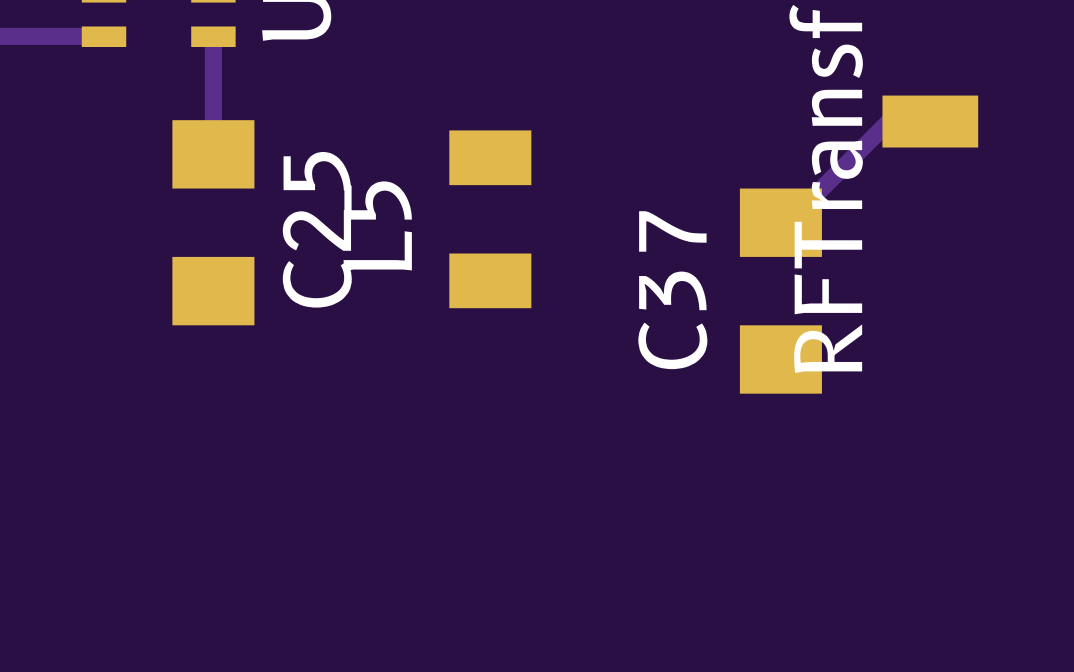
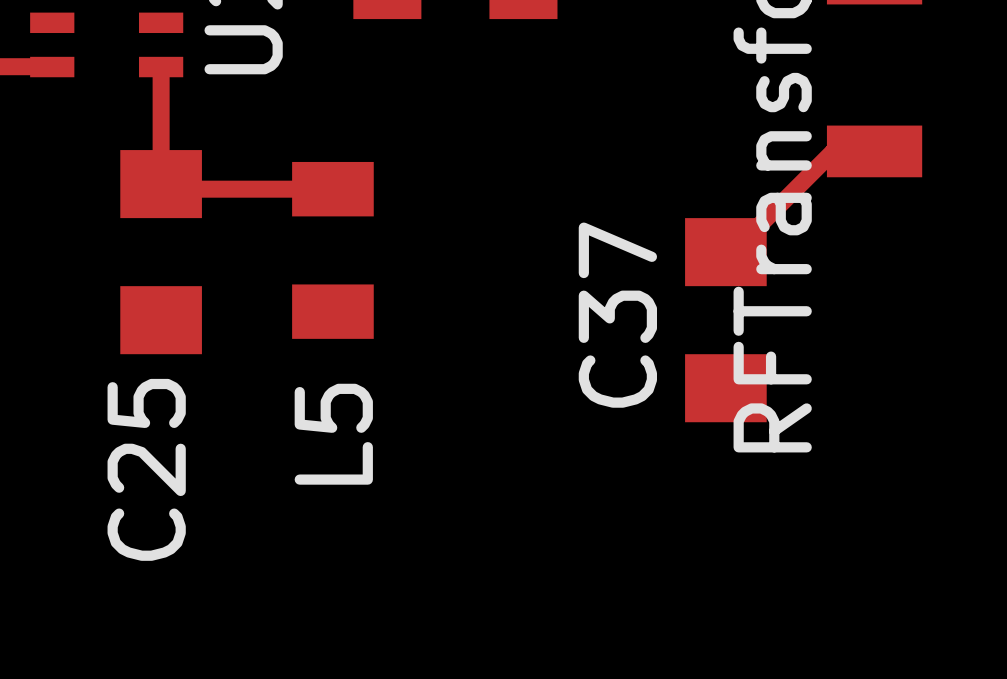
track: none -> (161, 184) (166, 189) (332, 189)
L5 position: (490, 219) -> (332, 250)
L5 name position: L5 (377, 226) -> L5 (333, 434)
C25 name position: C25 (317, 229) -> C25 (146, 469)

